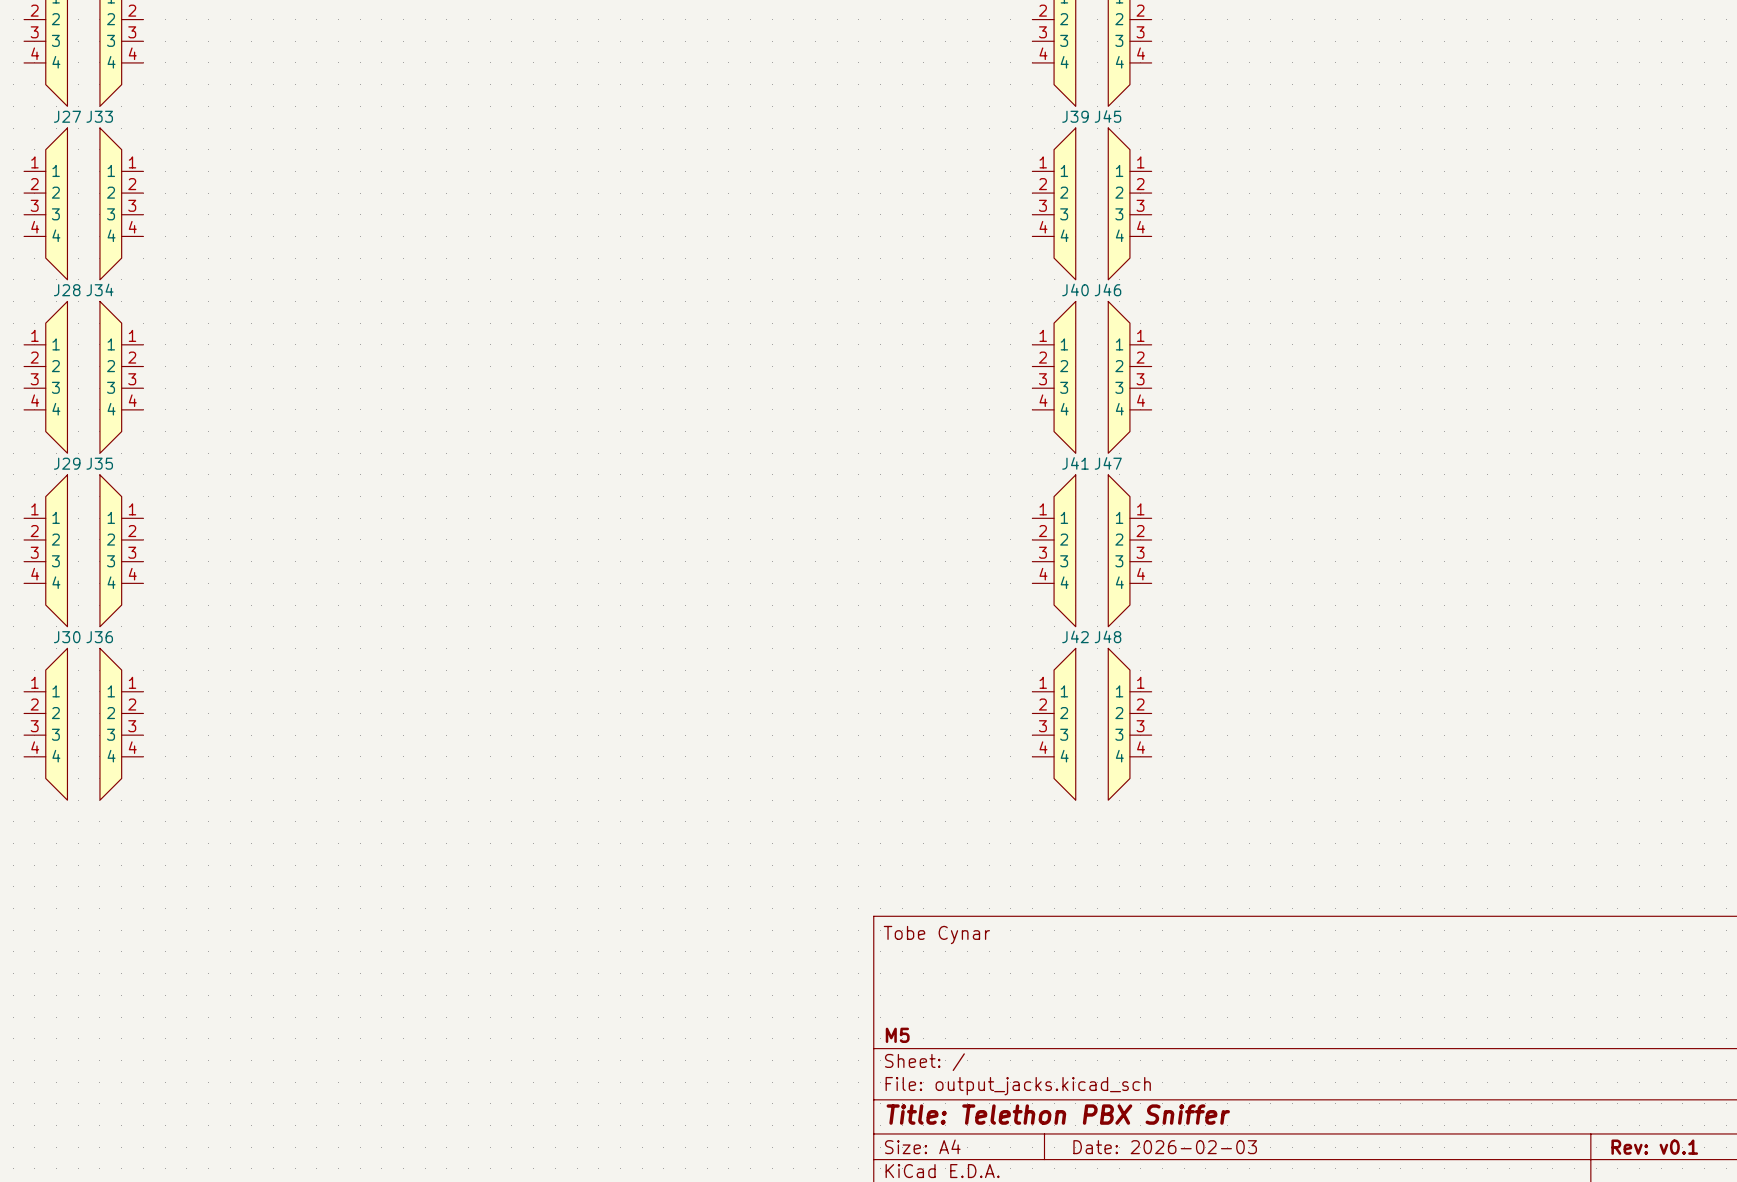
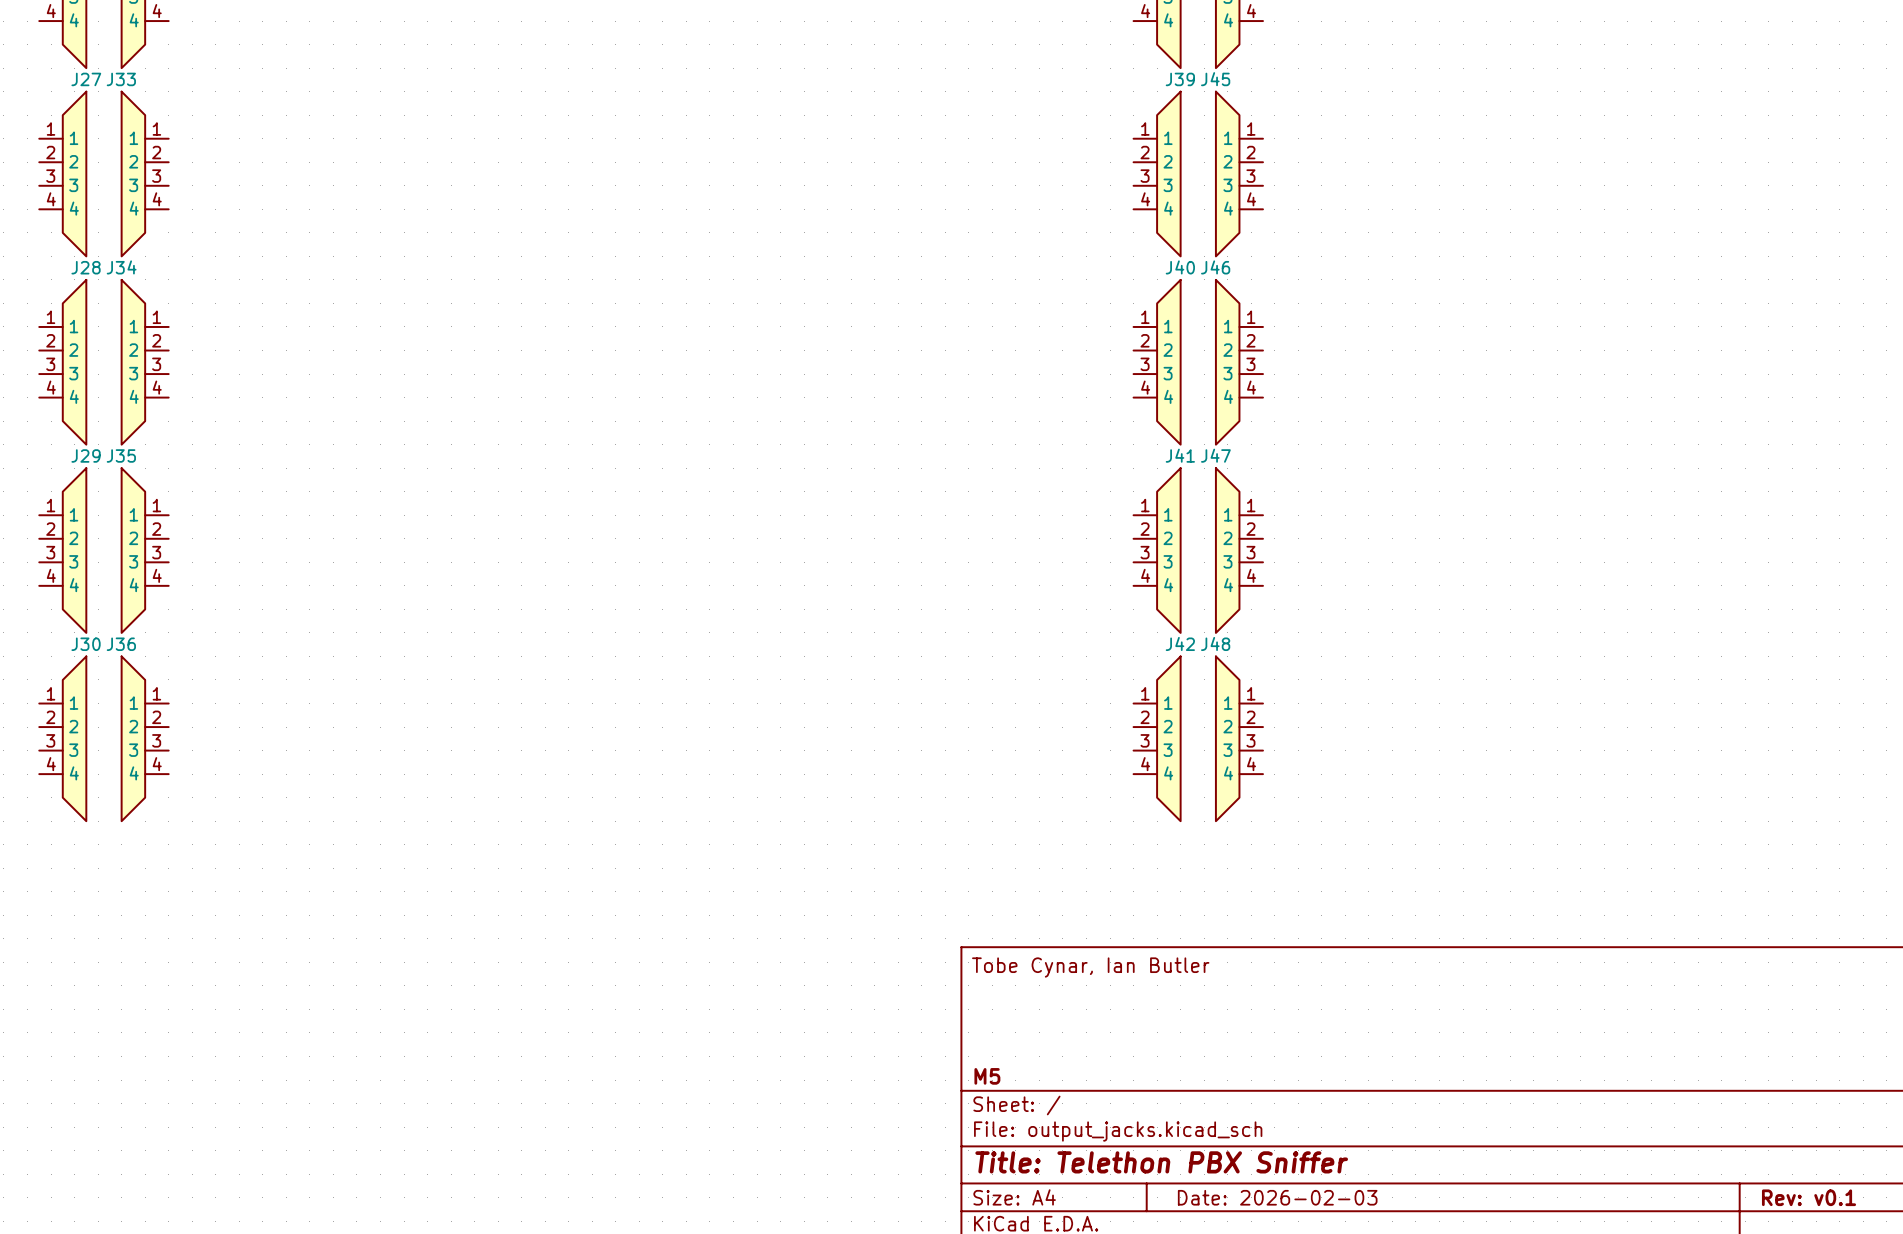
title block: Tobe Cynar (936, 935) -> Tobe Cynar, Ian Butler (1090, 967)

